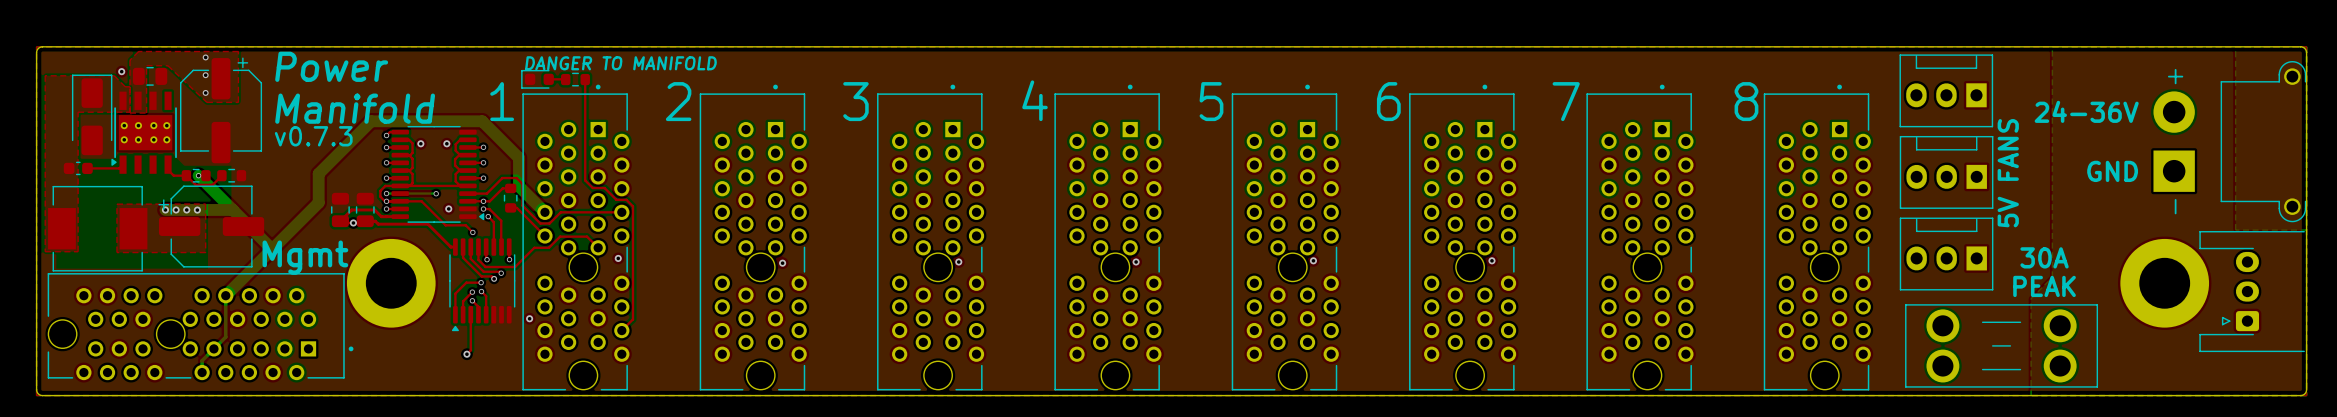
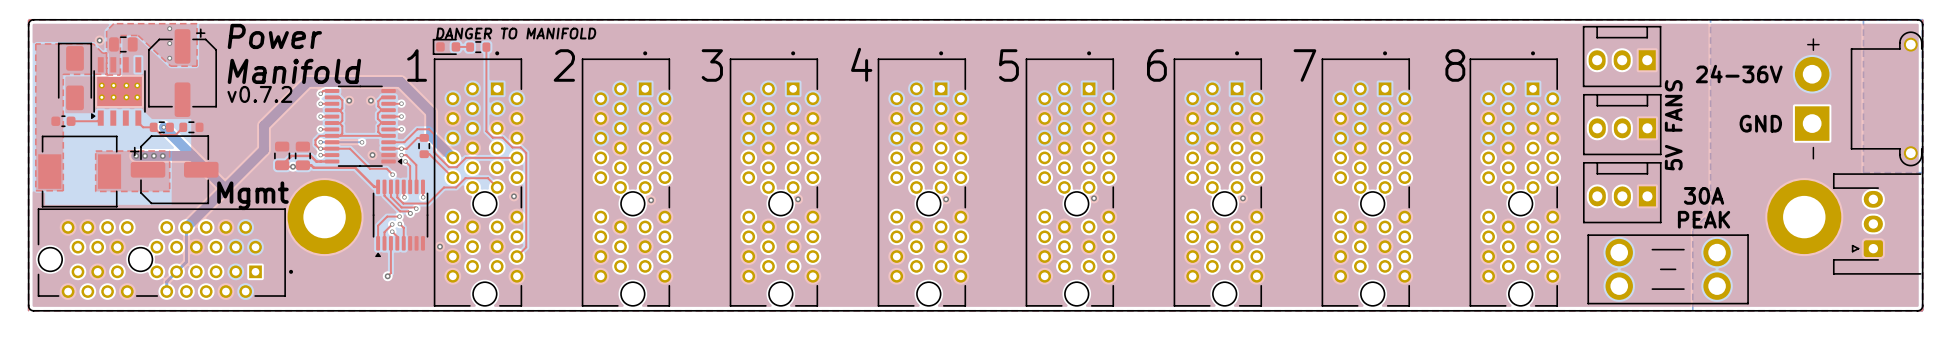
text: v0.7.3 (313, 136) -> v0.7.2 (259, 94)

